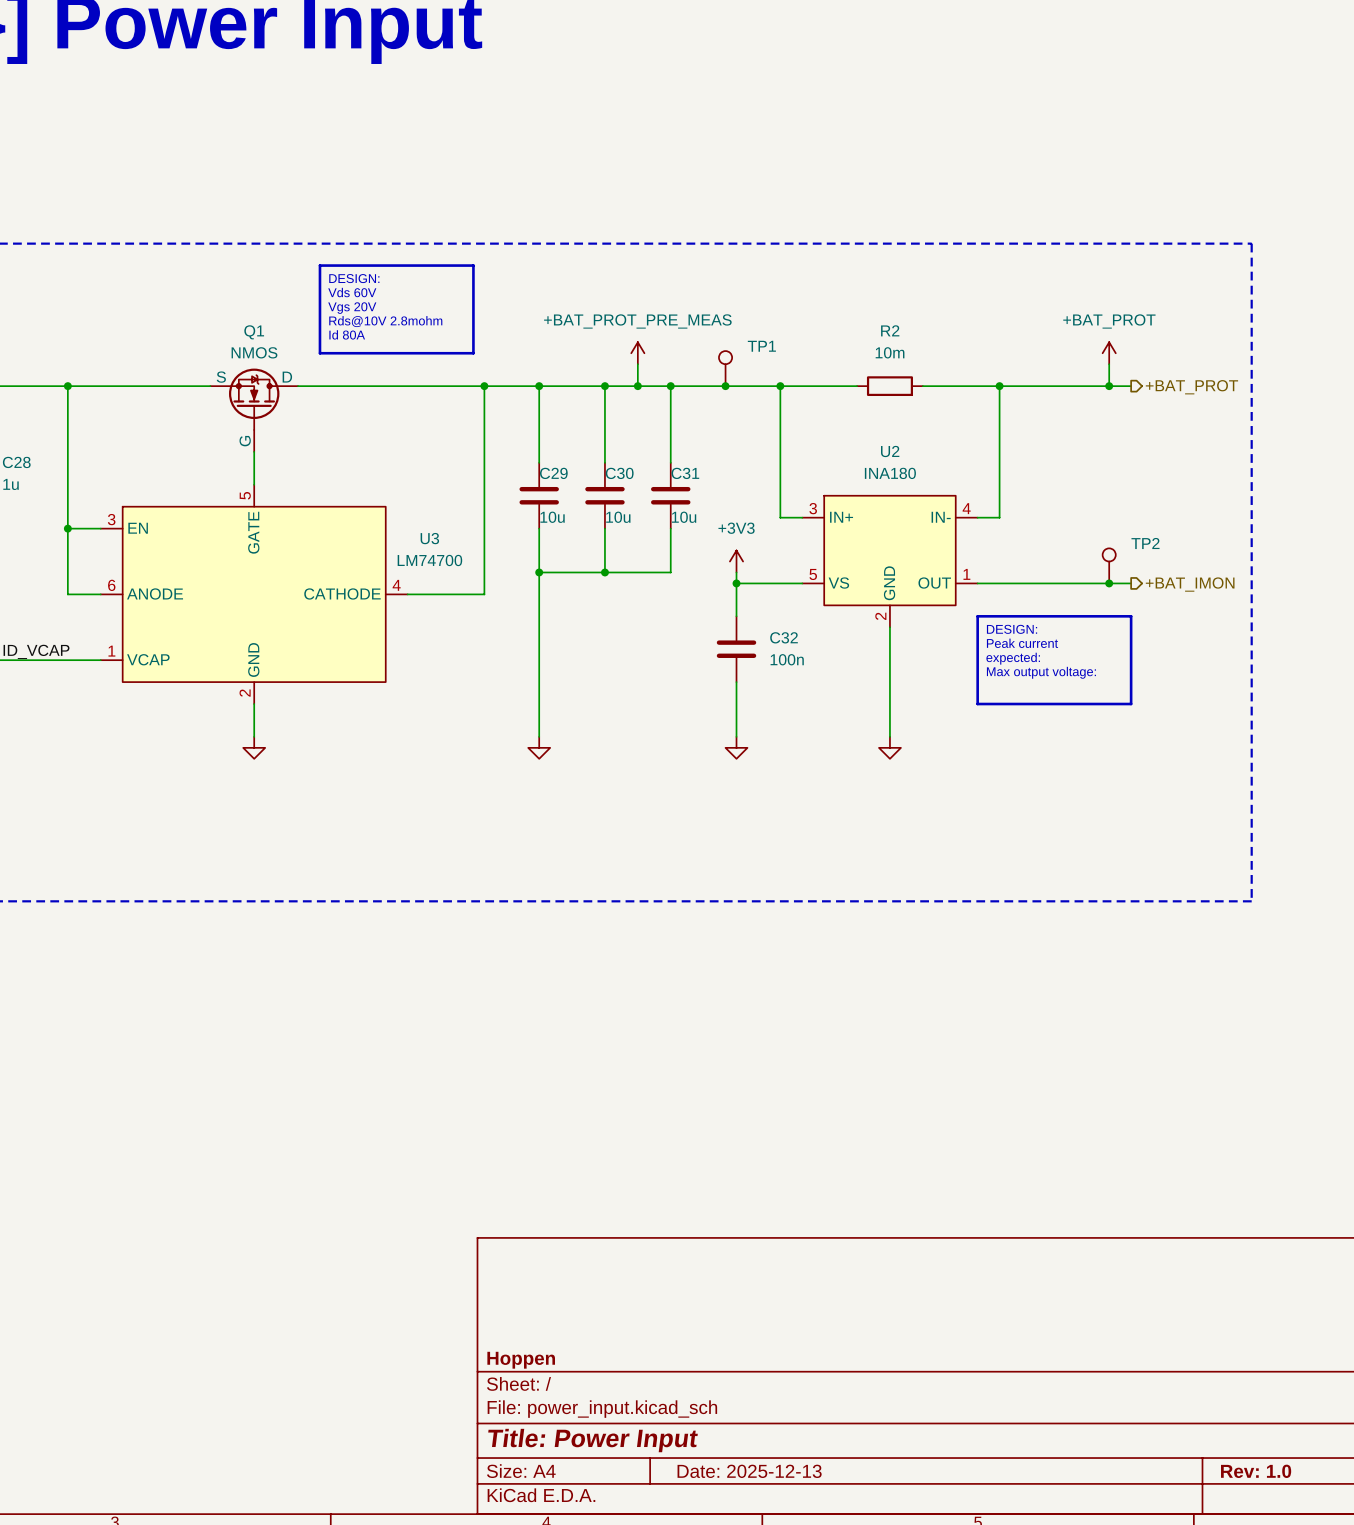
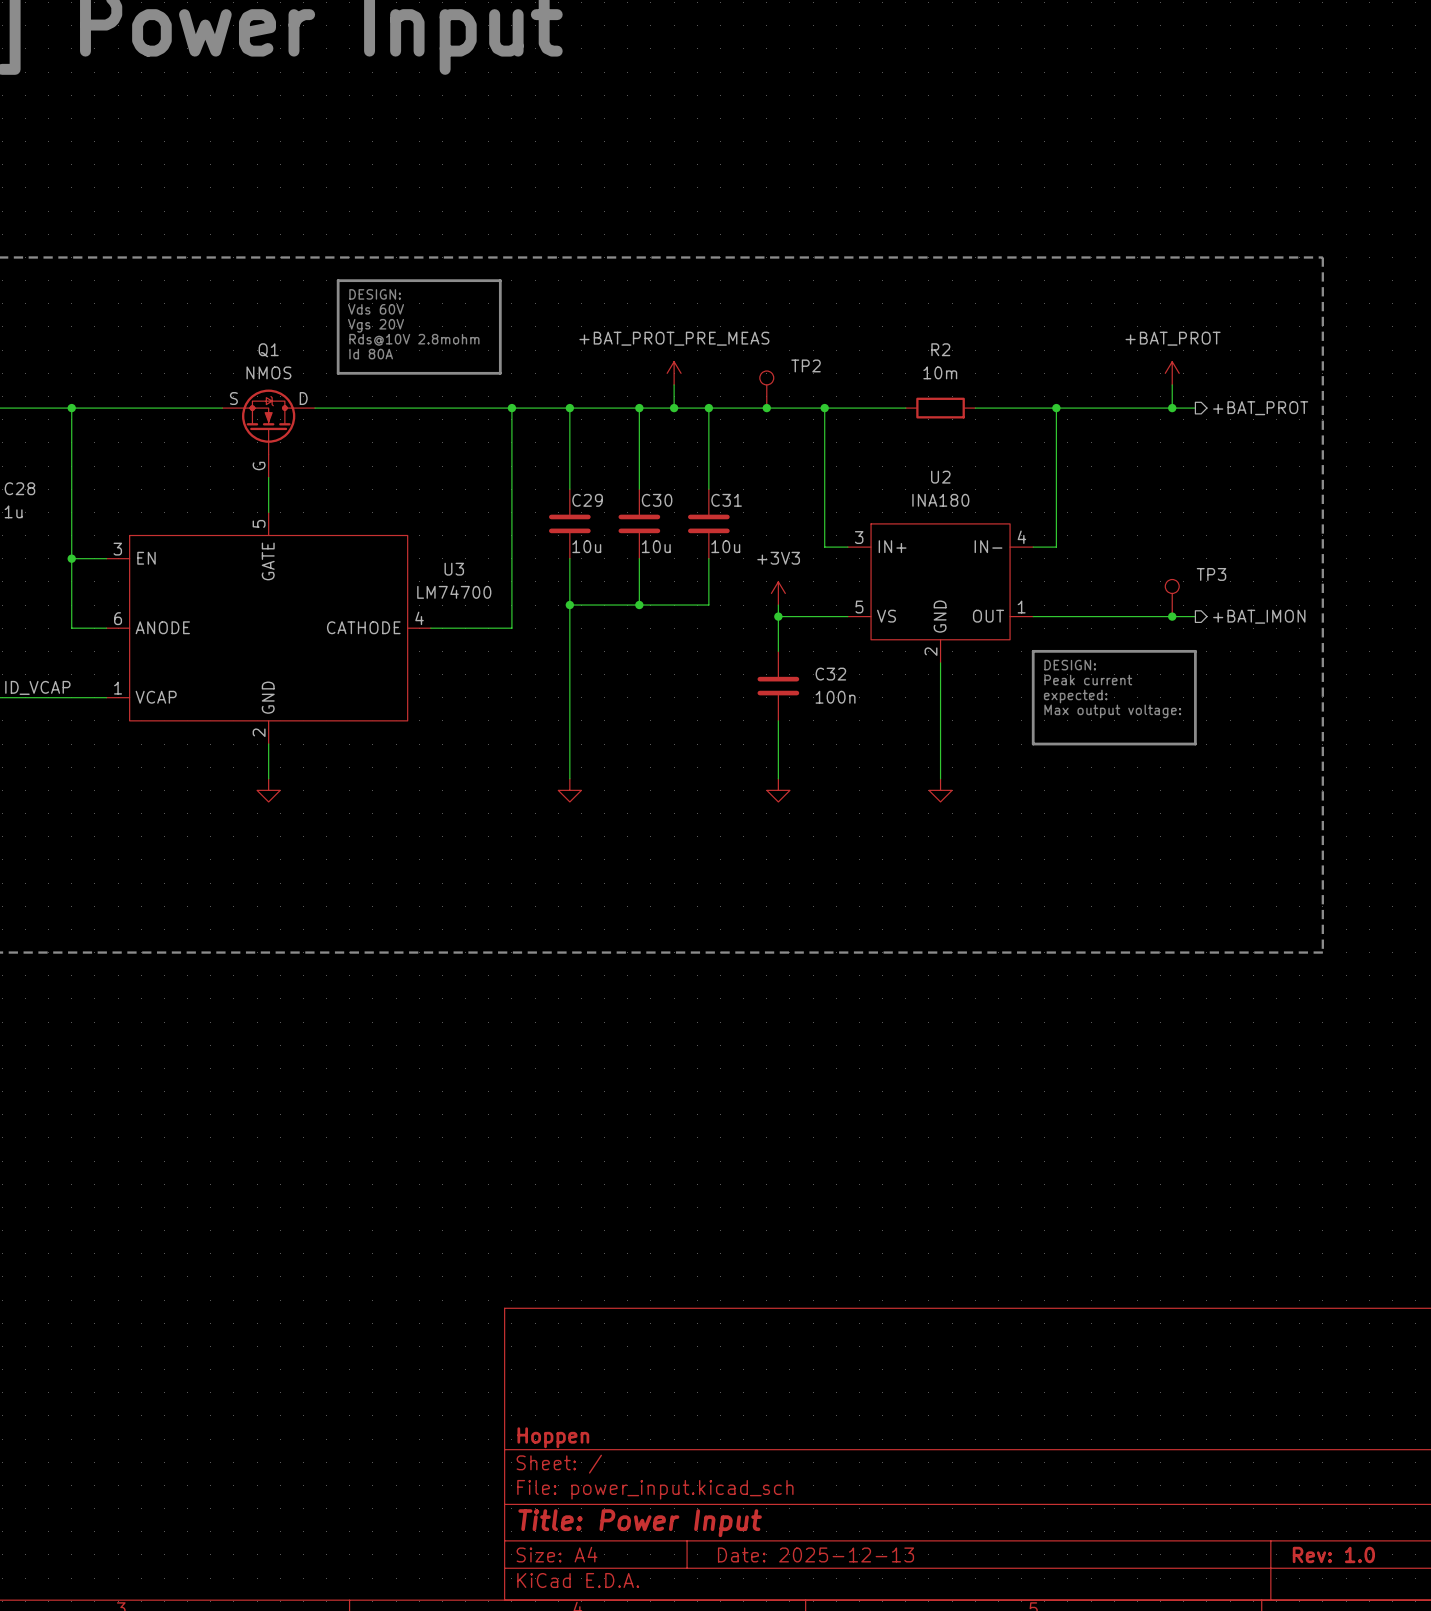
TP1 name: TP1 (761, 346) -> TP2 (806, 365)
TP2 name: TP2 (1145, 543) -> TP3 (1211, 574)

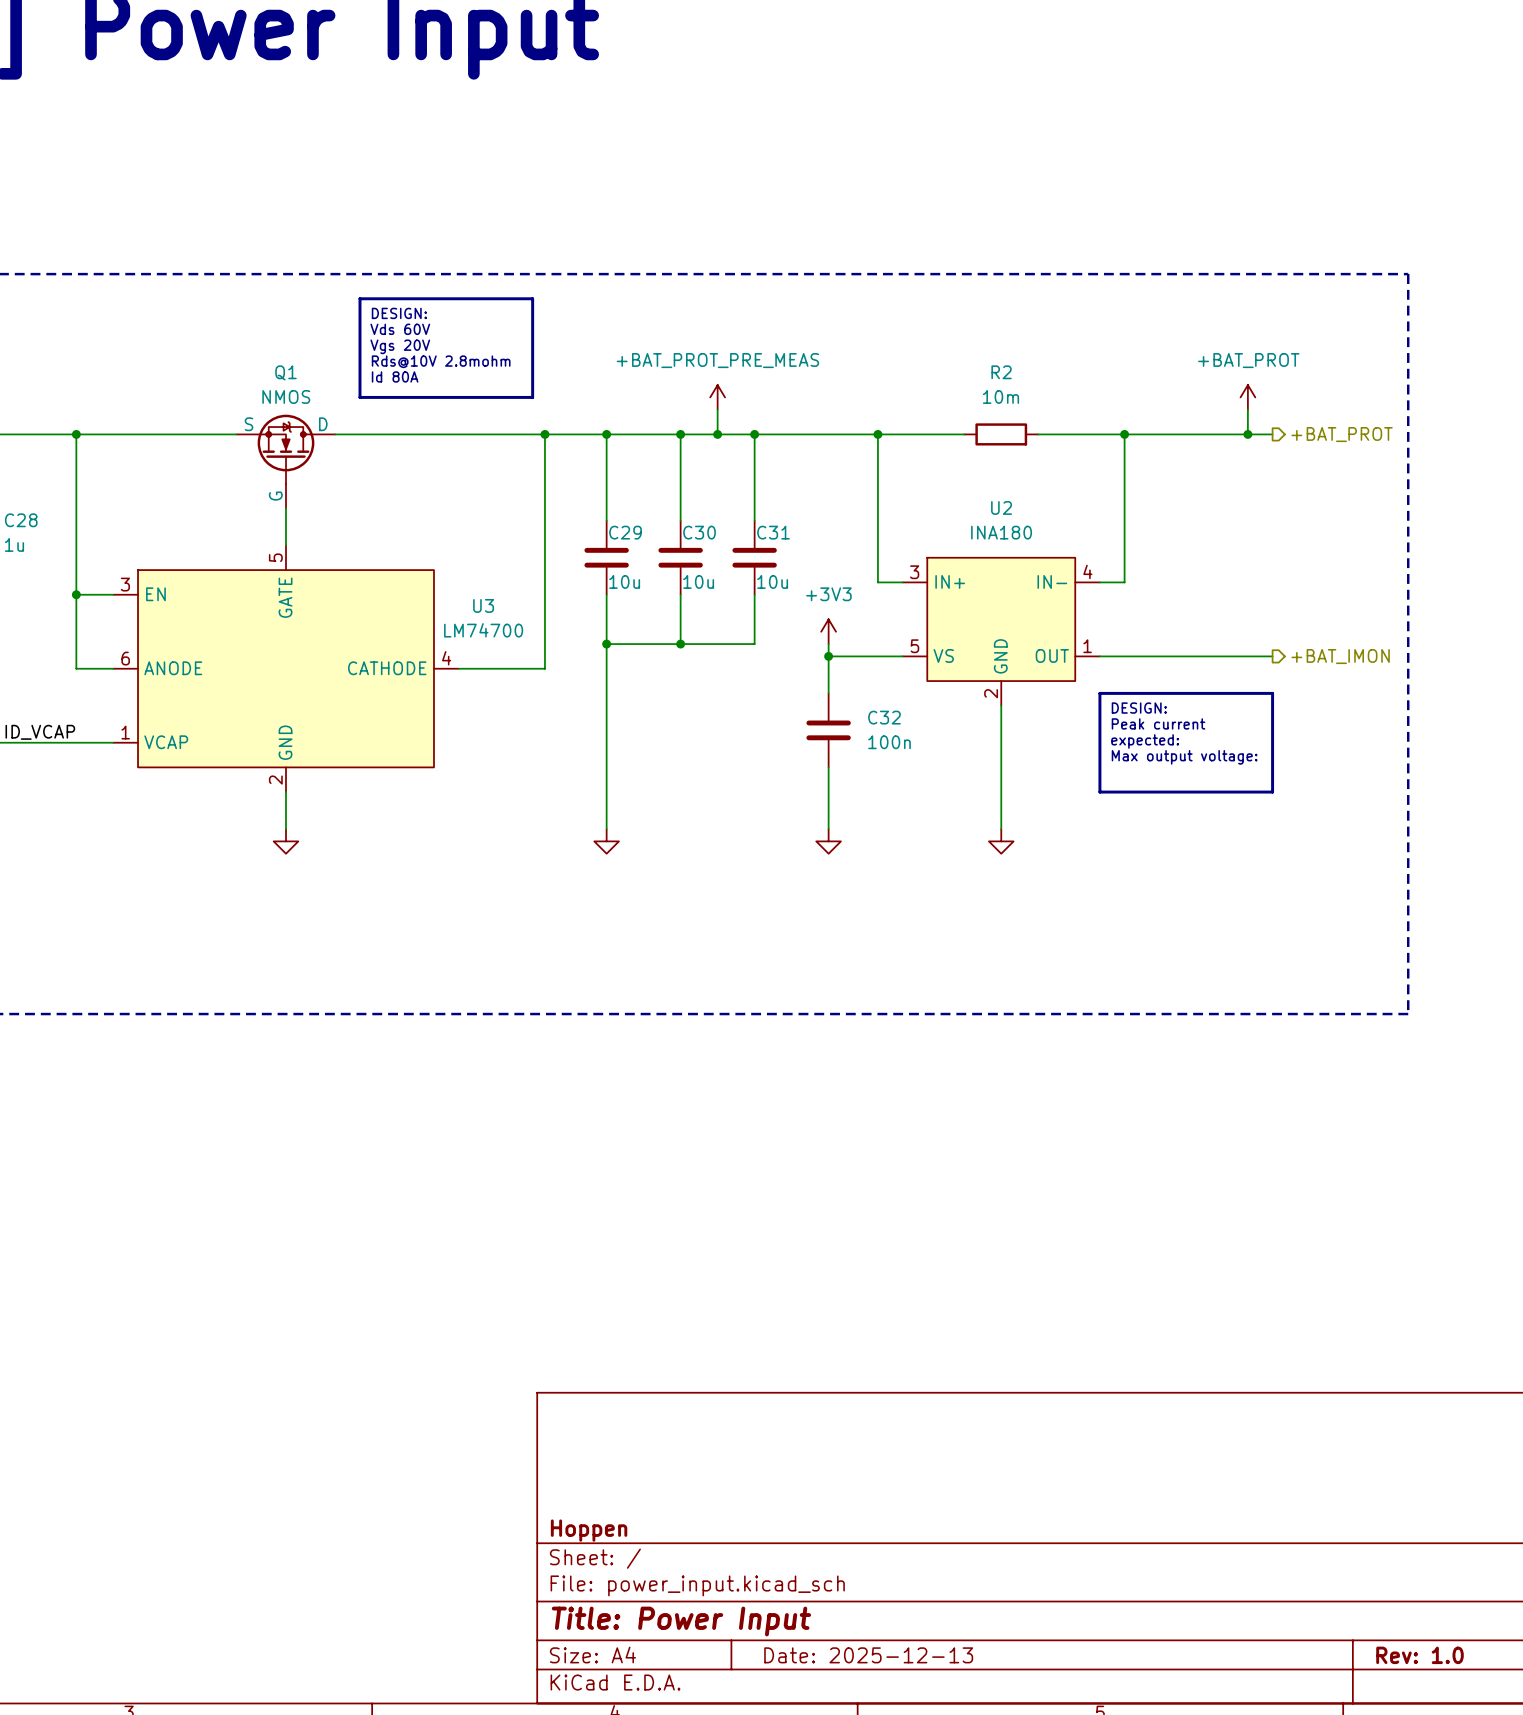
TP2: (766, 389) -> none
junction: (766, 408) -> none
TP3: (1172, 598) -> none
junction: (1172, 616) -> none

